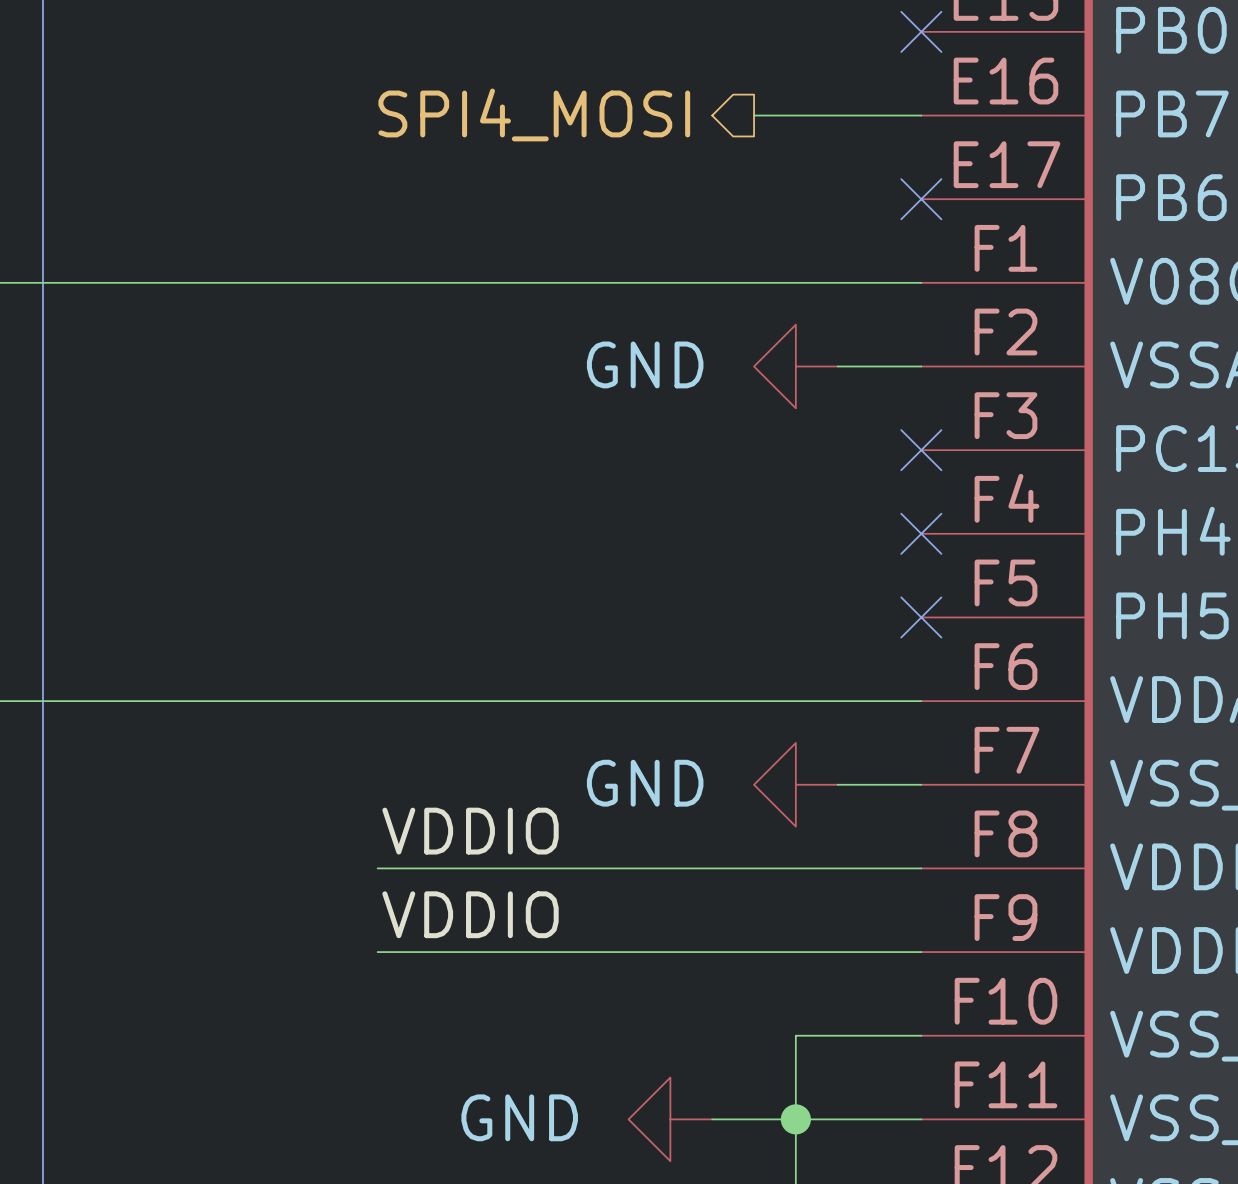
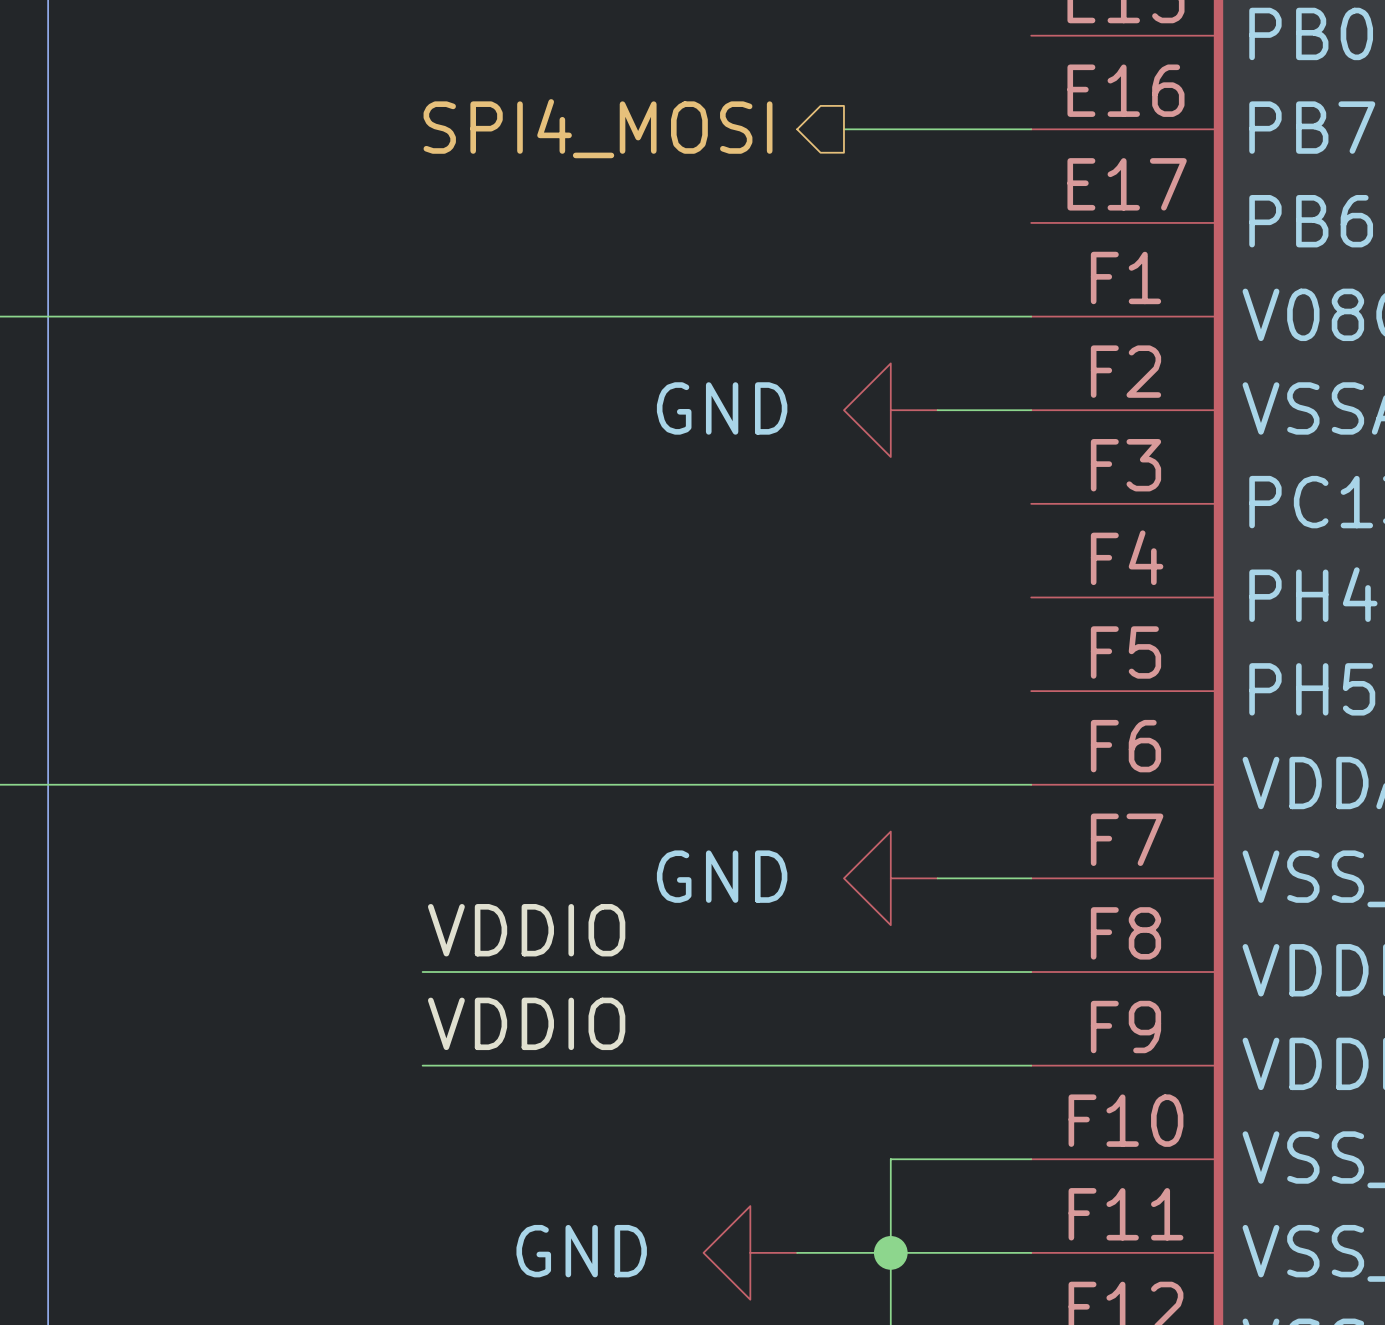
no-connect mark: (921, 31) -> none
no-connect mark: (921, 199) -> none
no-connect mark: (921, 450) -> none
no-connect mark: (921, 533) -> none
no-connect mark: (921, 617) -> none

